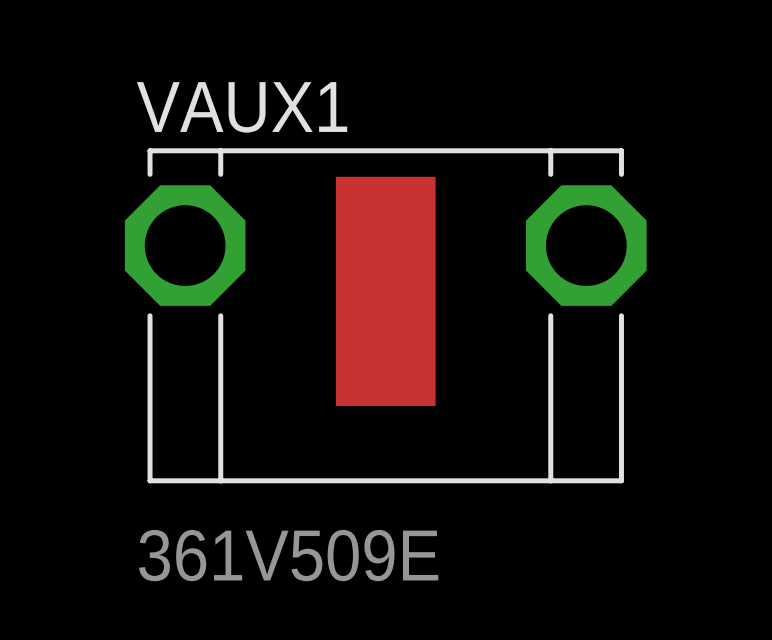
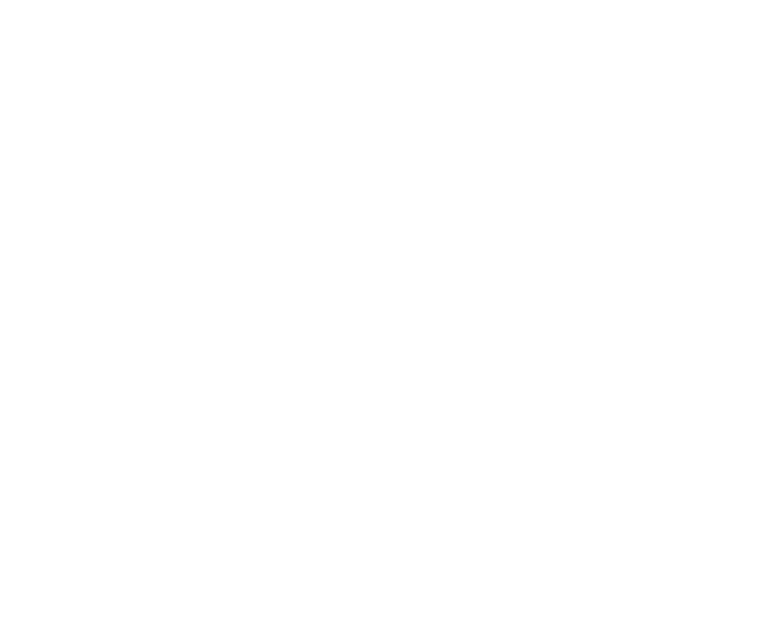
VAUX1: 361V509E (385, 315) -> none

